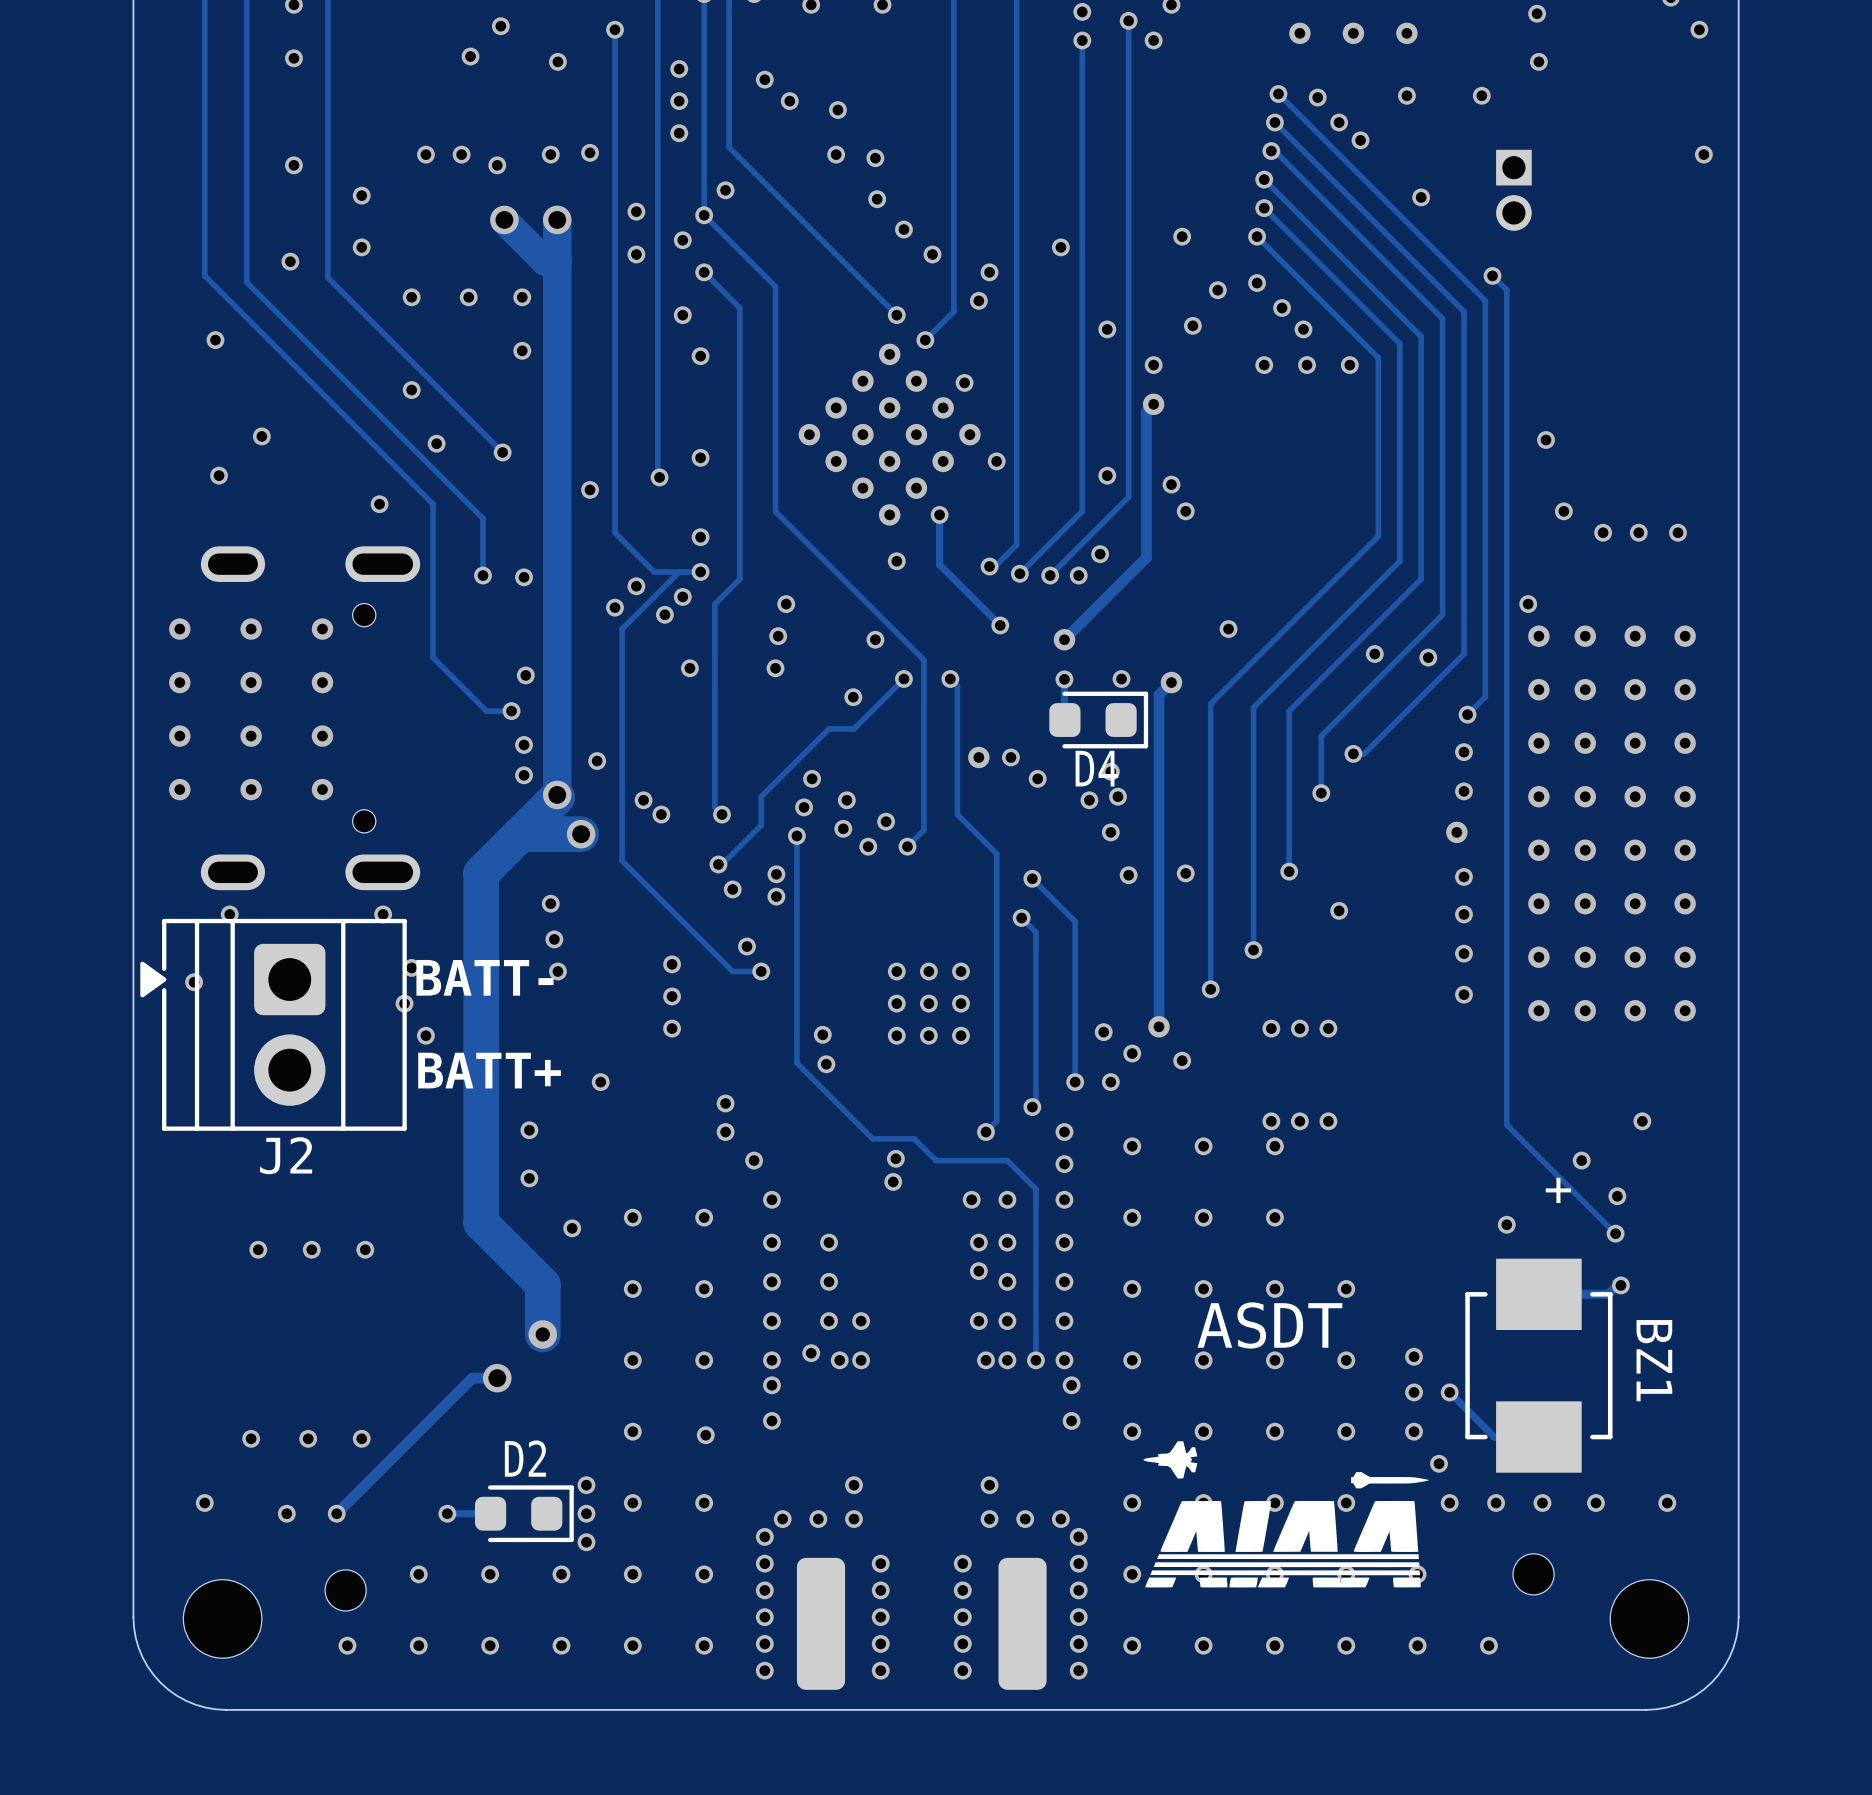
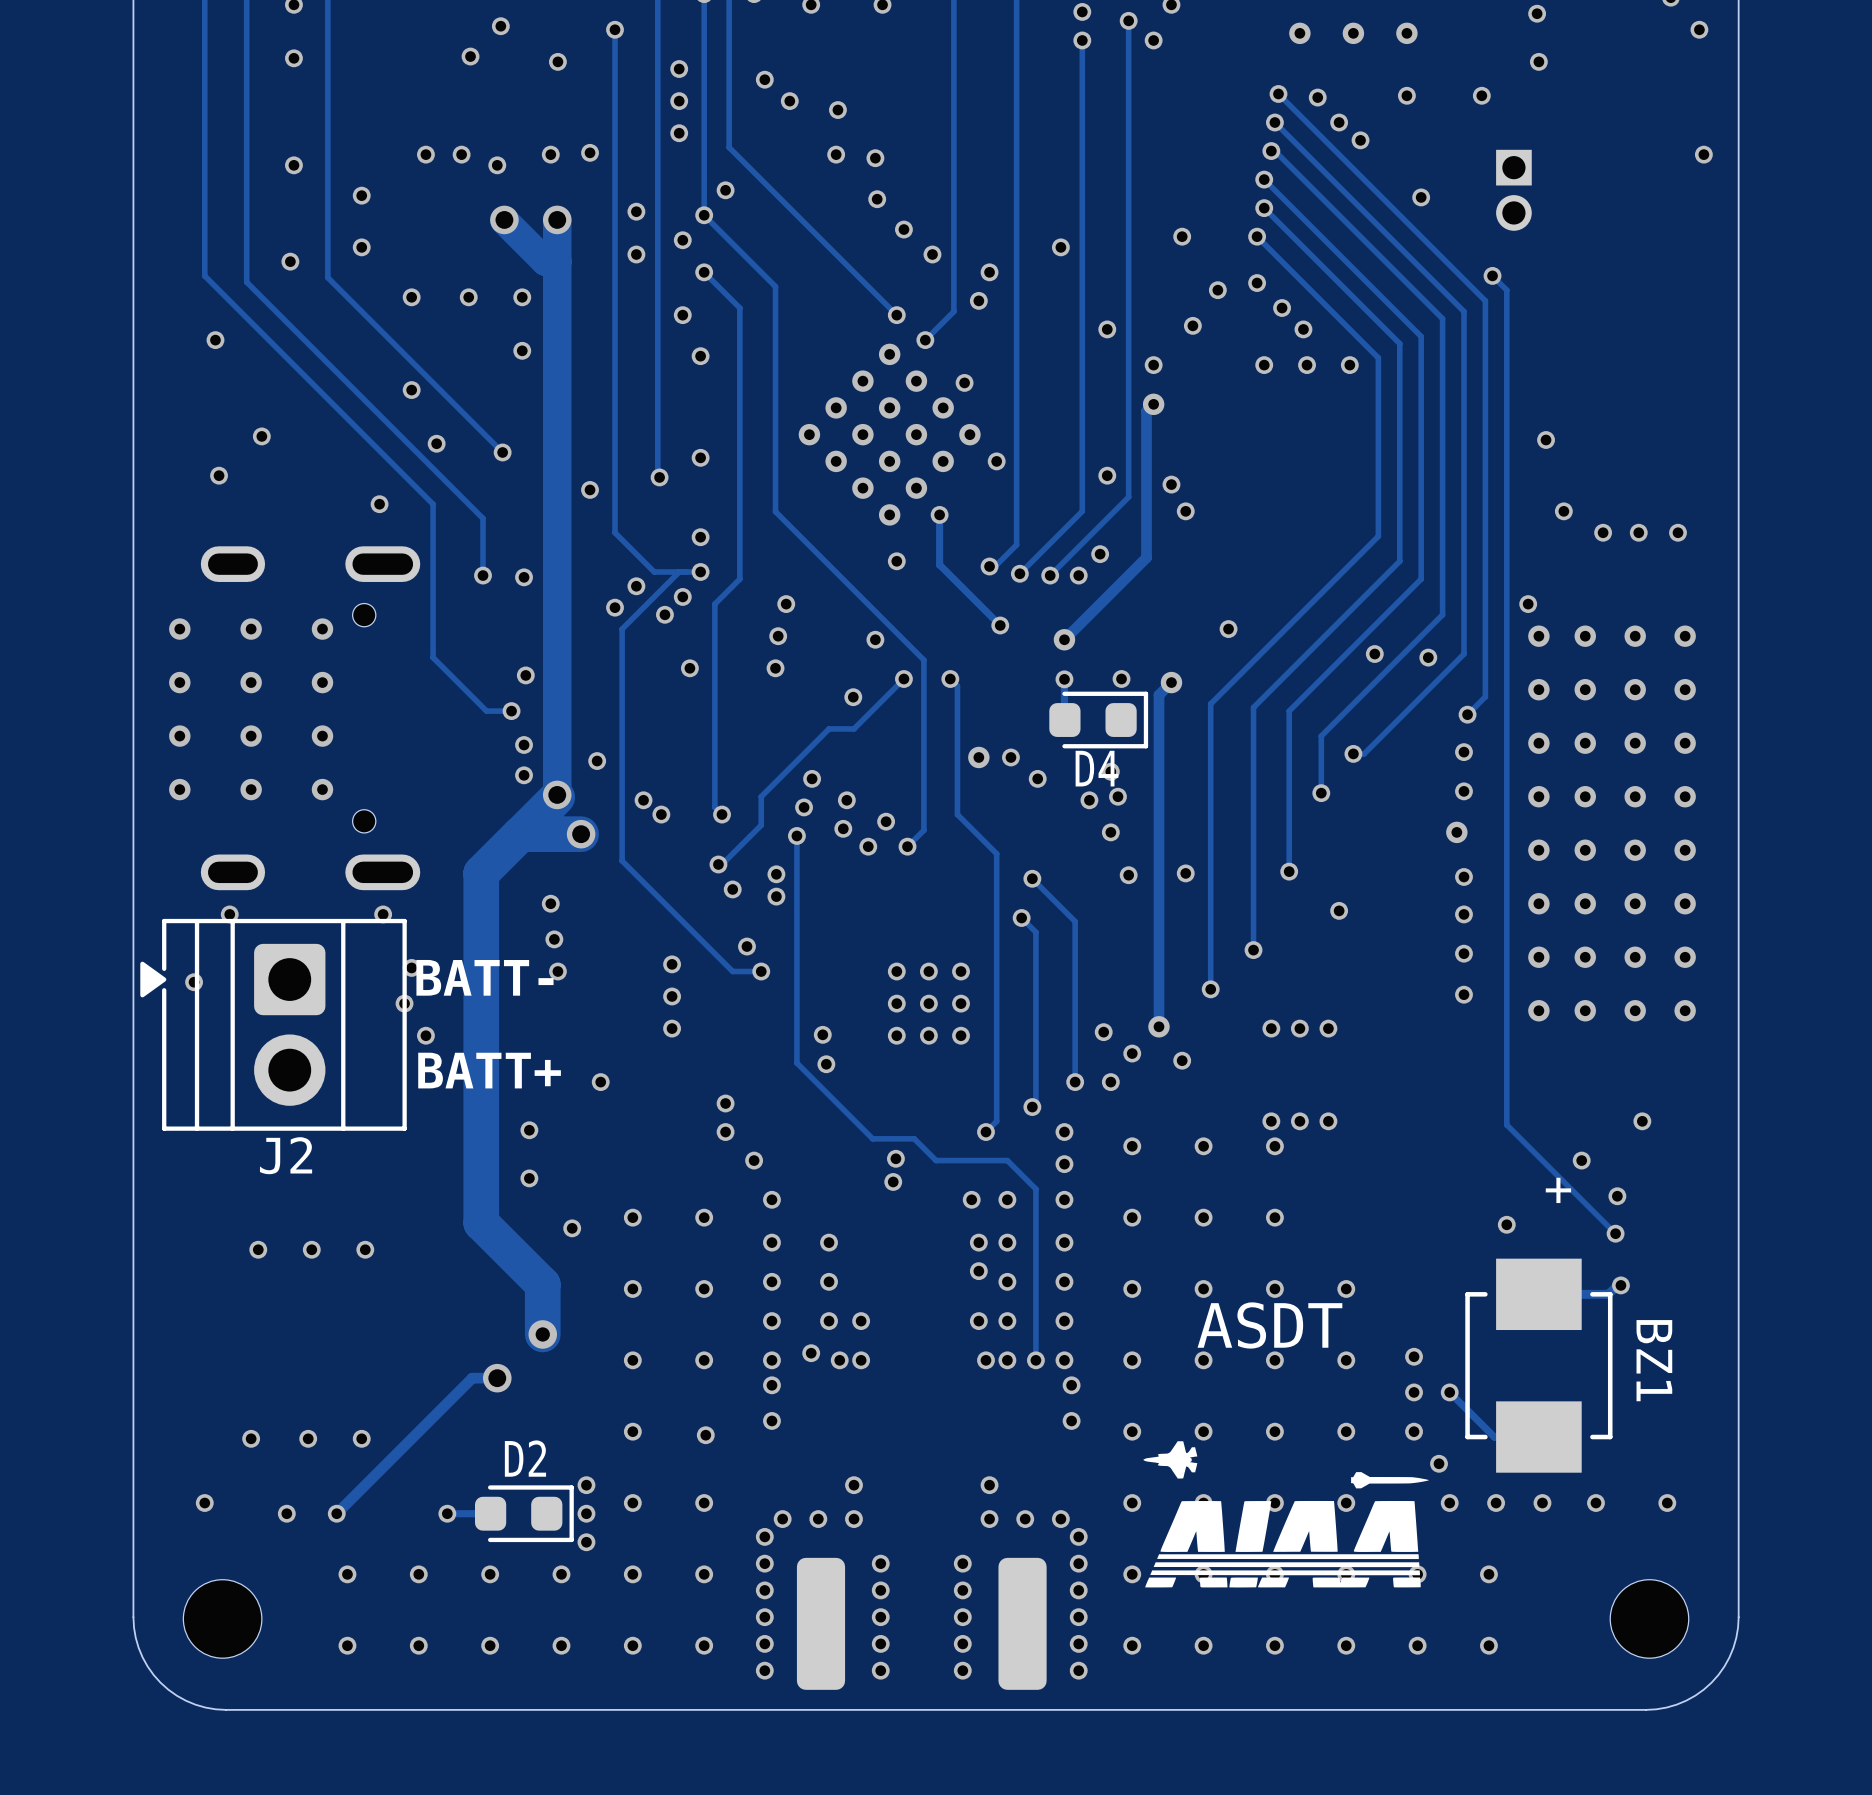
via: none -> (347, 1574)
via: none -> (1488, 1574)
part: (1533, 1574) -> none
part: (345, 1590) -> none

